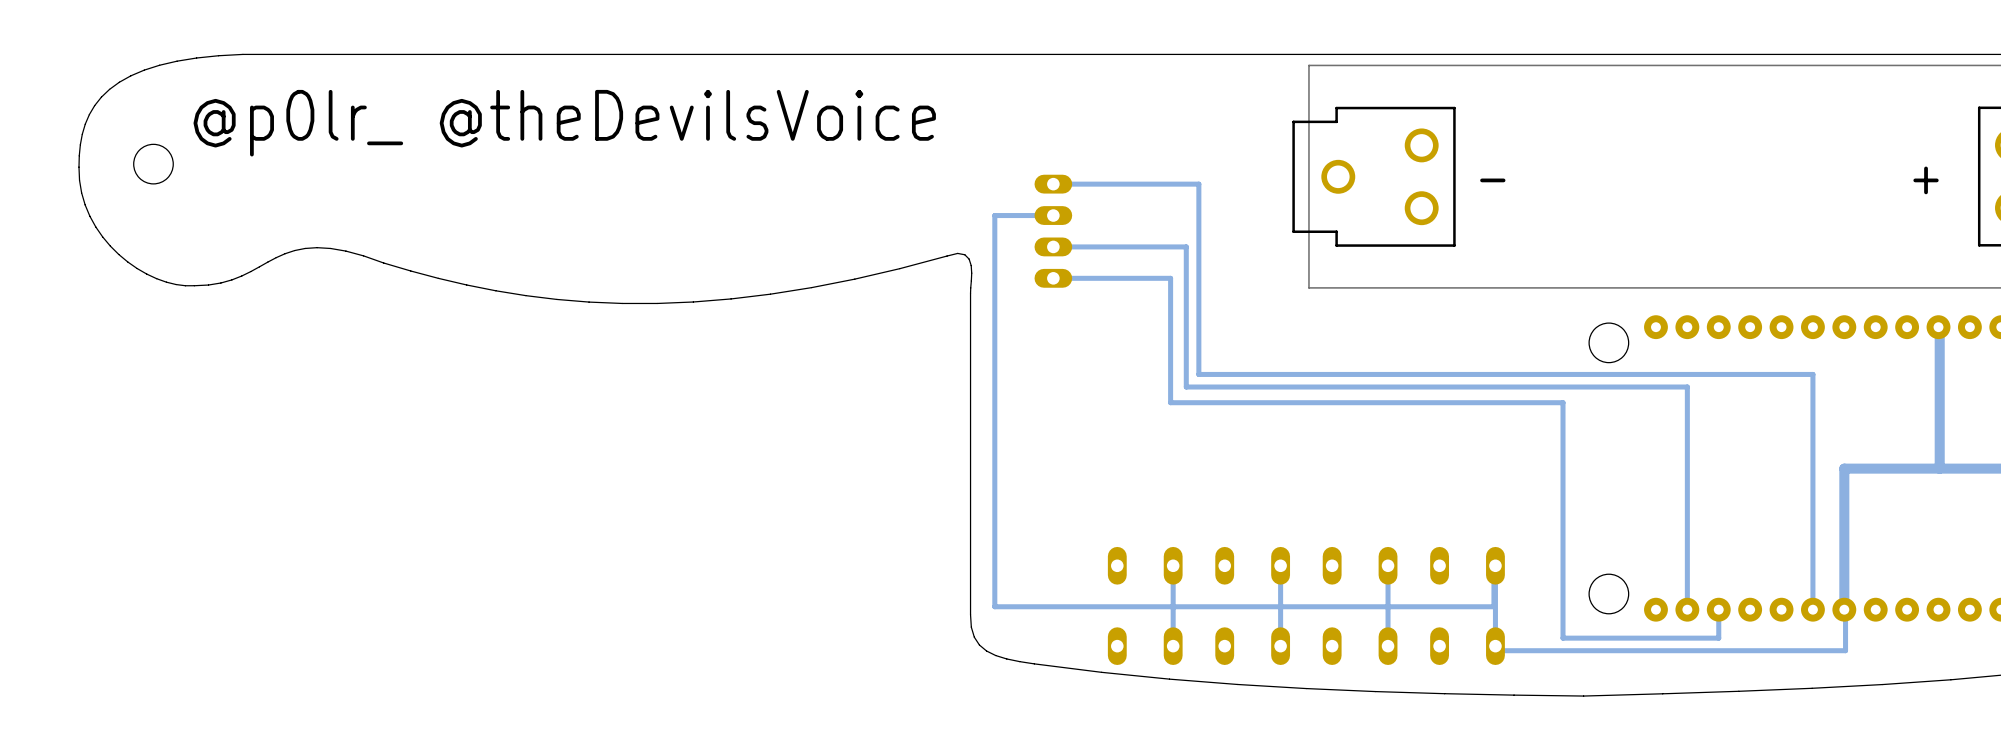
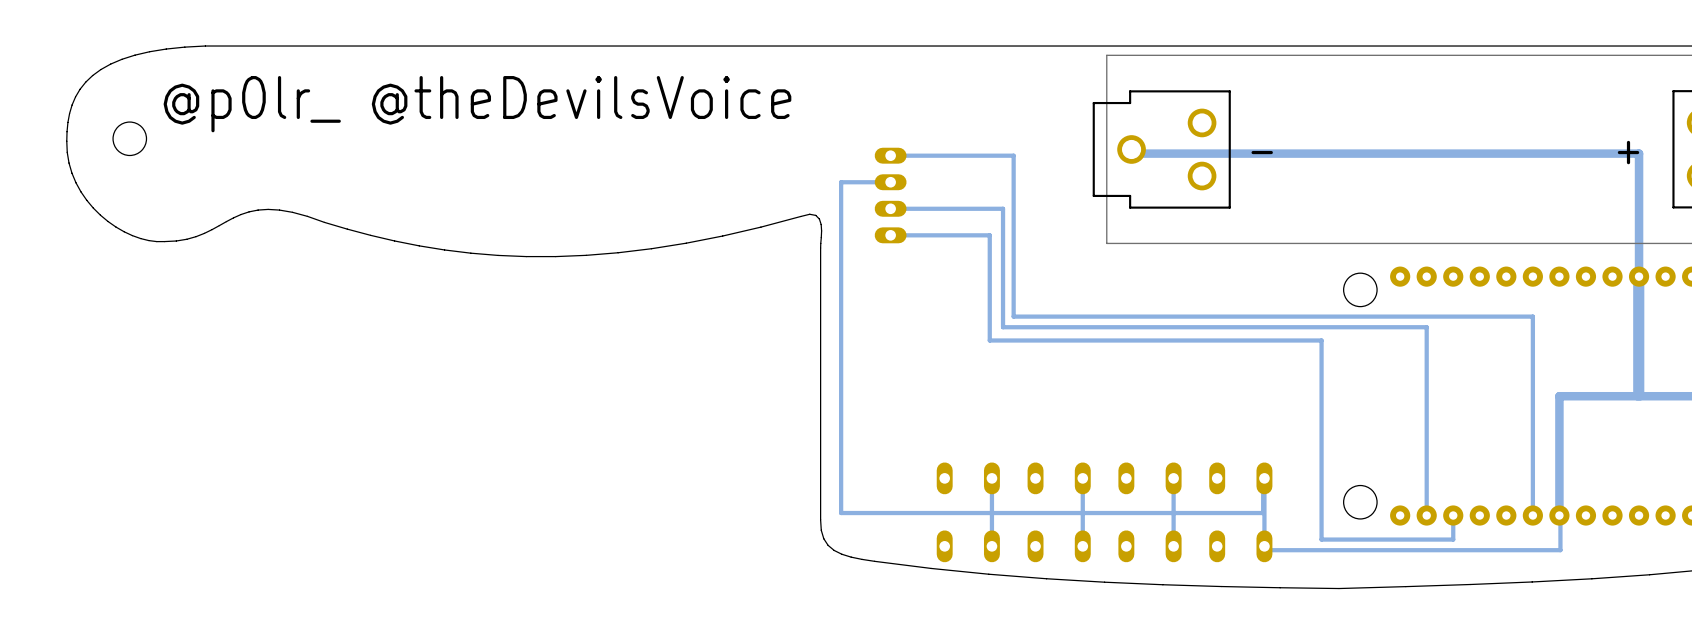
track: none -> (1132, 153) (1639, 153) (1637, 396)

